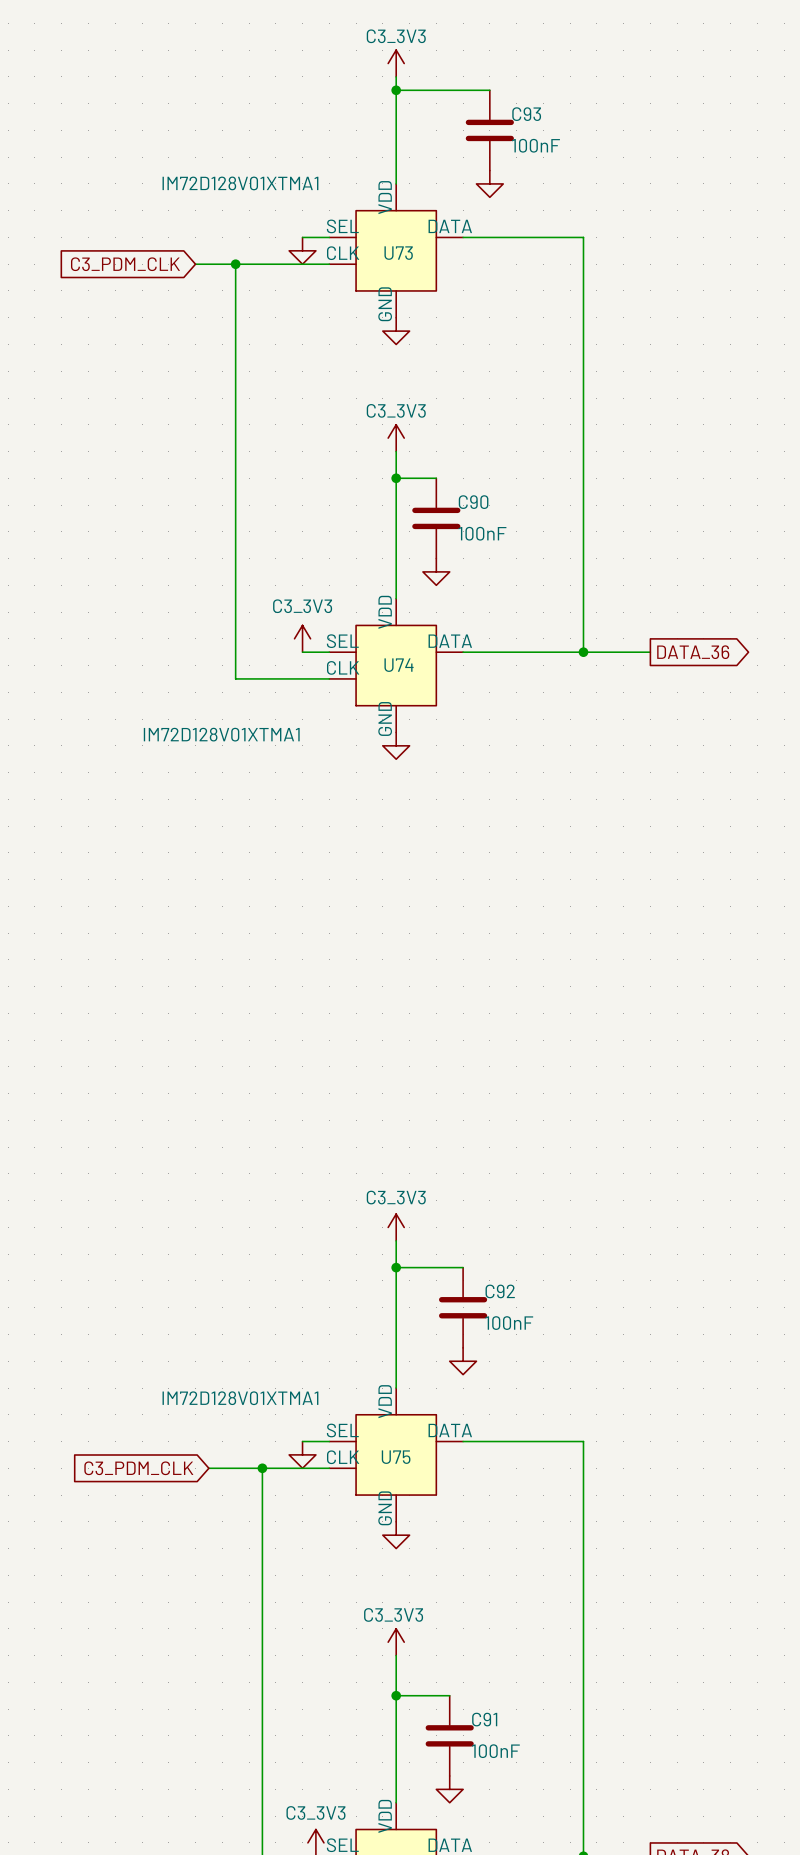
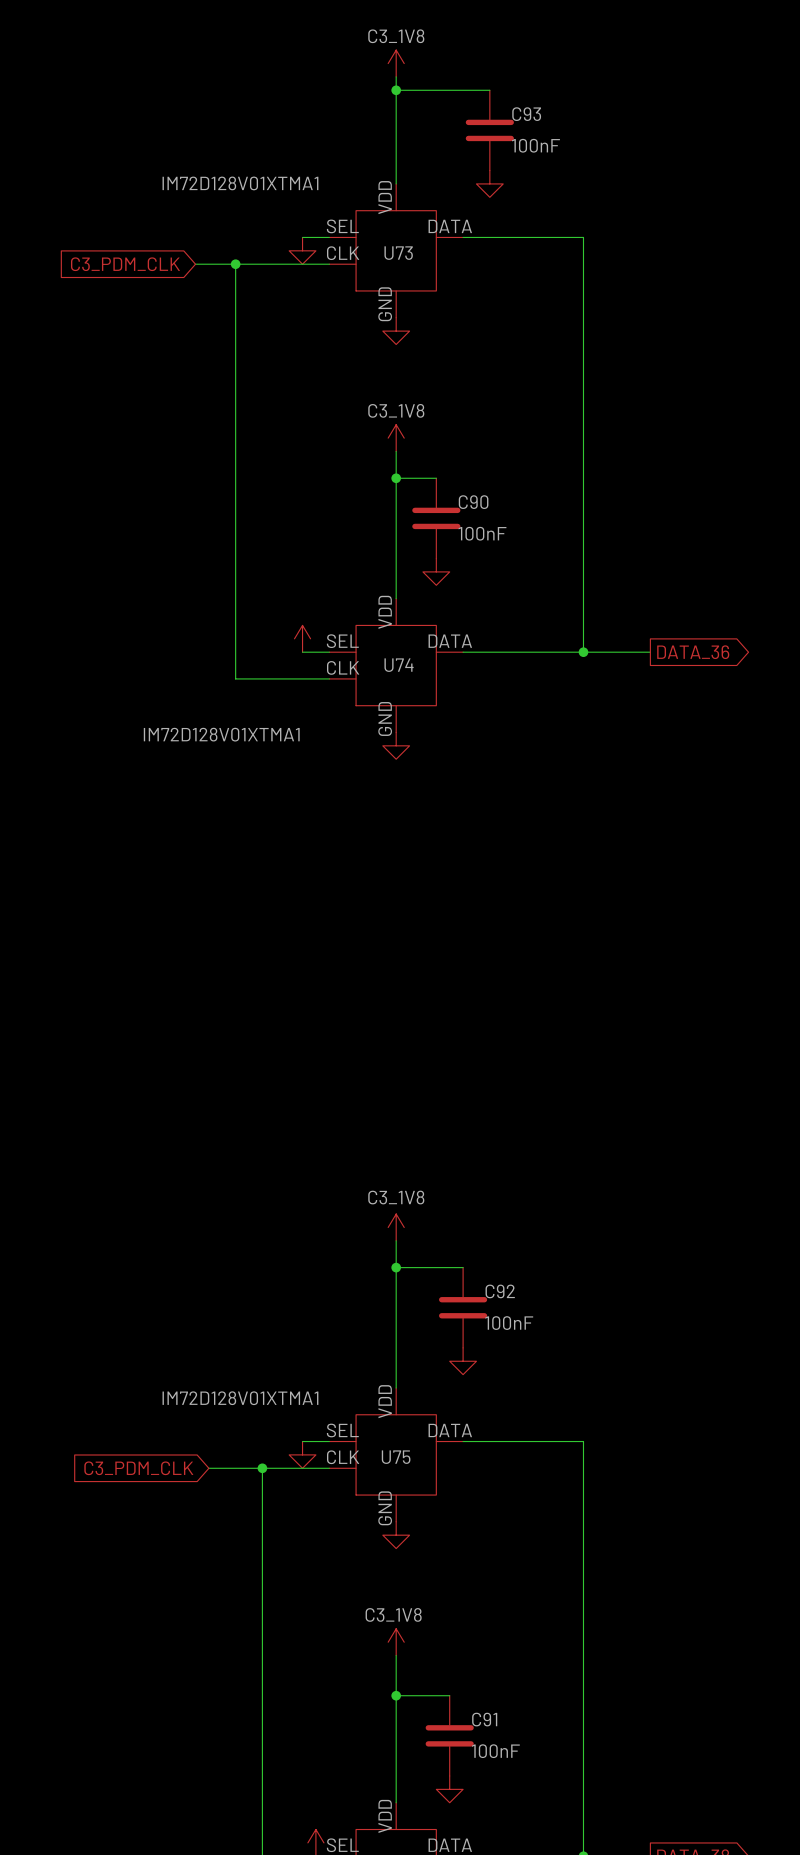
power symbol: C3_3V3 (396, 63) -> C3_1V8 (396, 63)
power symbol: C3_3V3 (396, 438) -> C3_1V8 (396, 438)
power symbol text: C3_3V3 (302, 606) -> none
power symbol: C3_3V3 (396, 1227) -> C3_1V8 (396, 1227)
power symbol: C3_3V3 (396, 1642) -> C3_1V8 (396, 1642)
power symbol text: C3_3V3 (315, 1812) -> none

